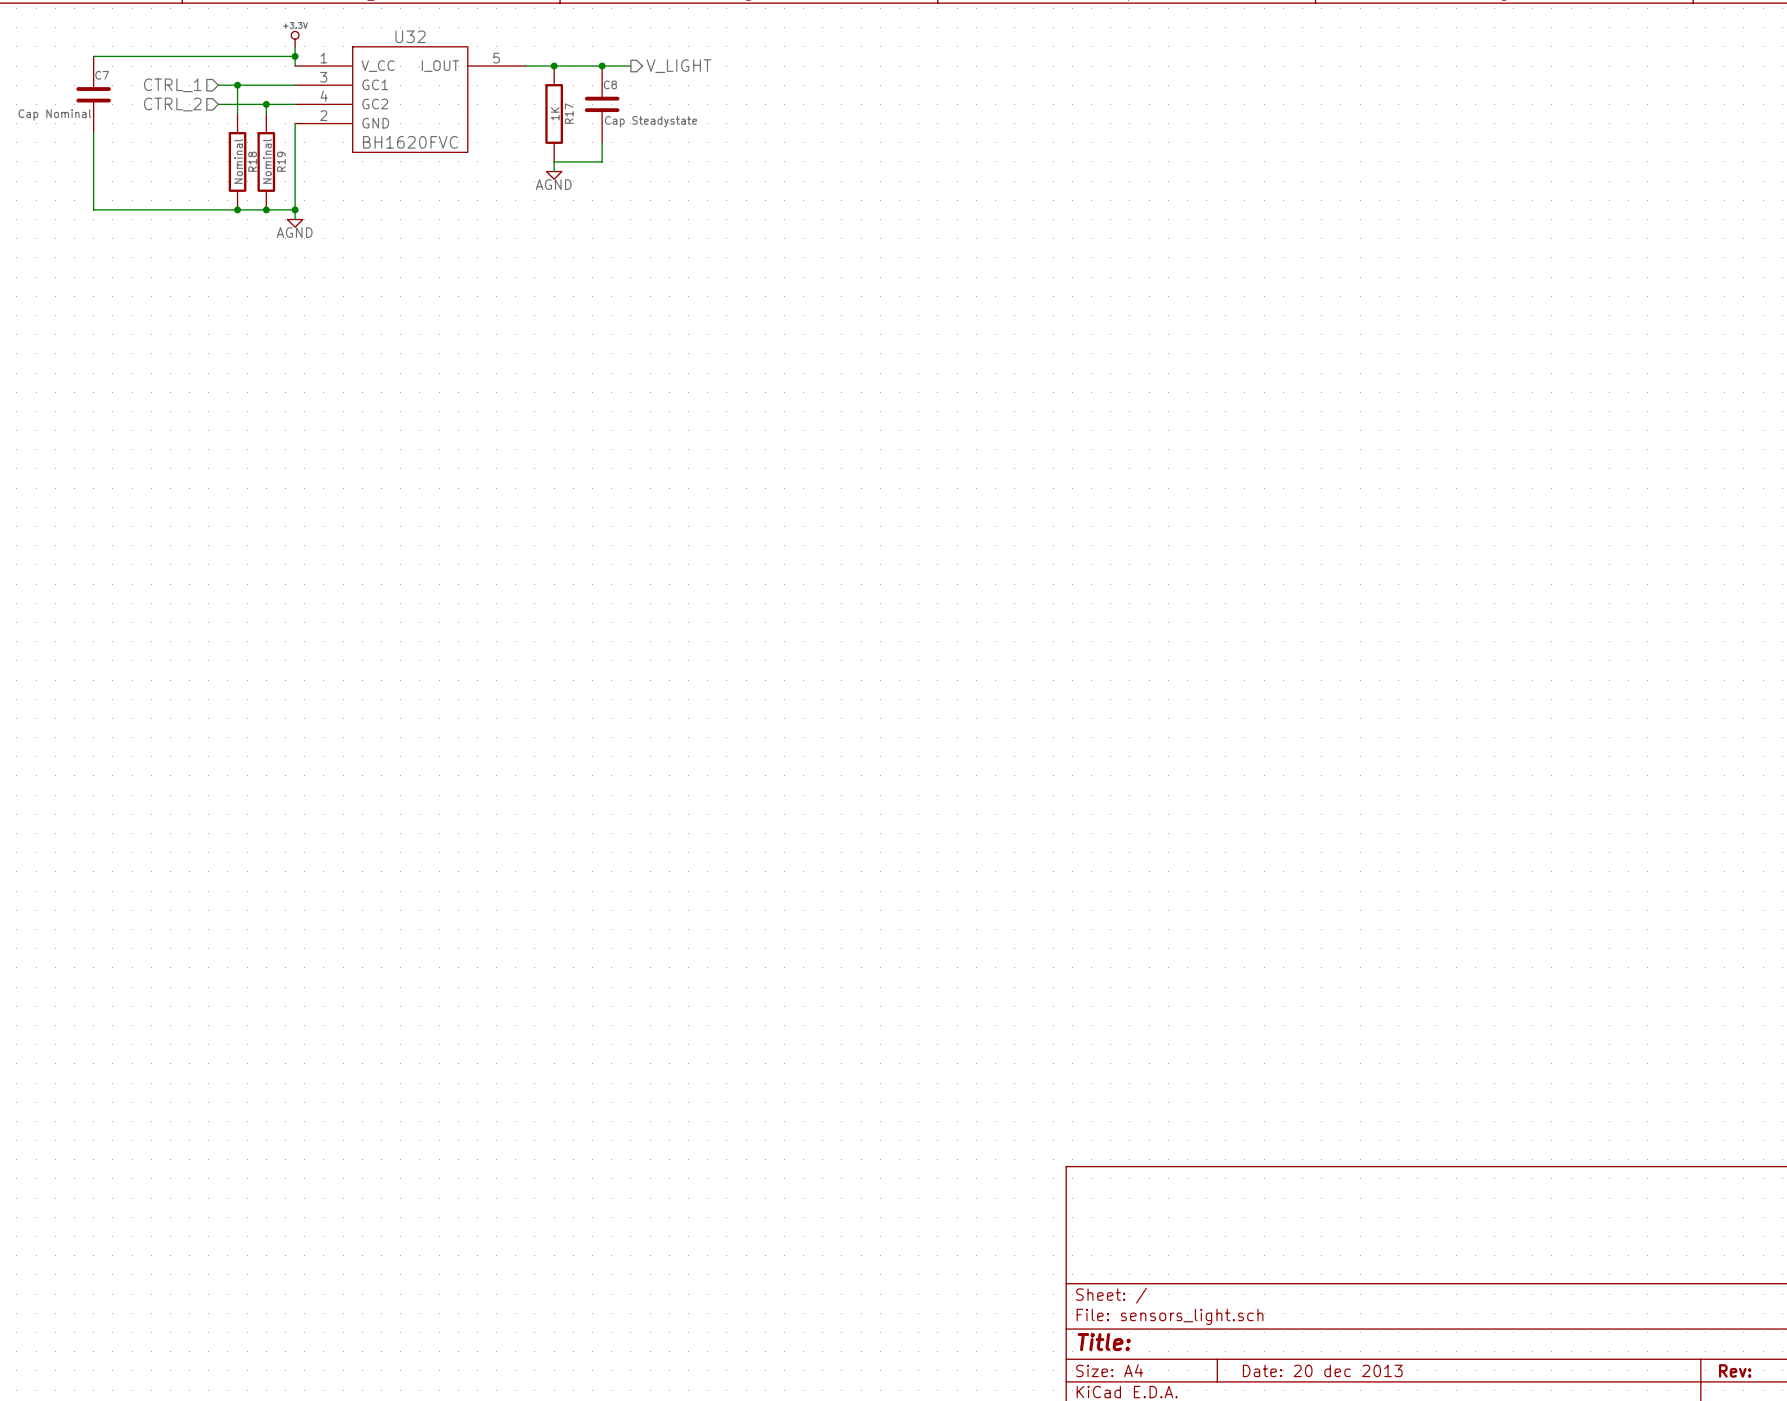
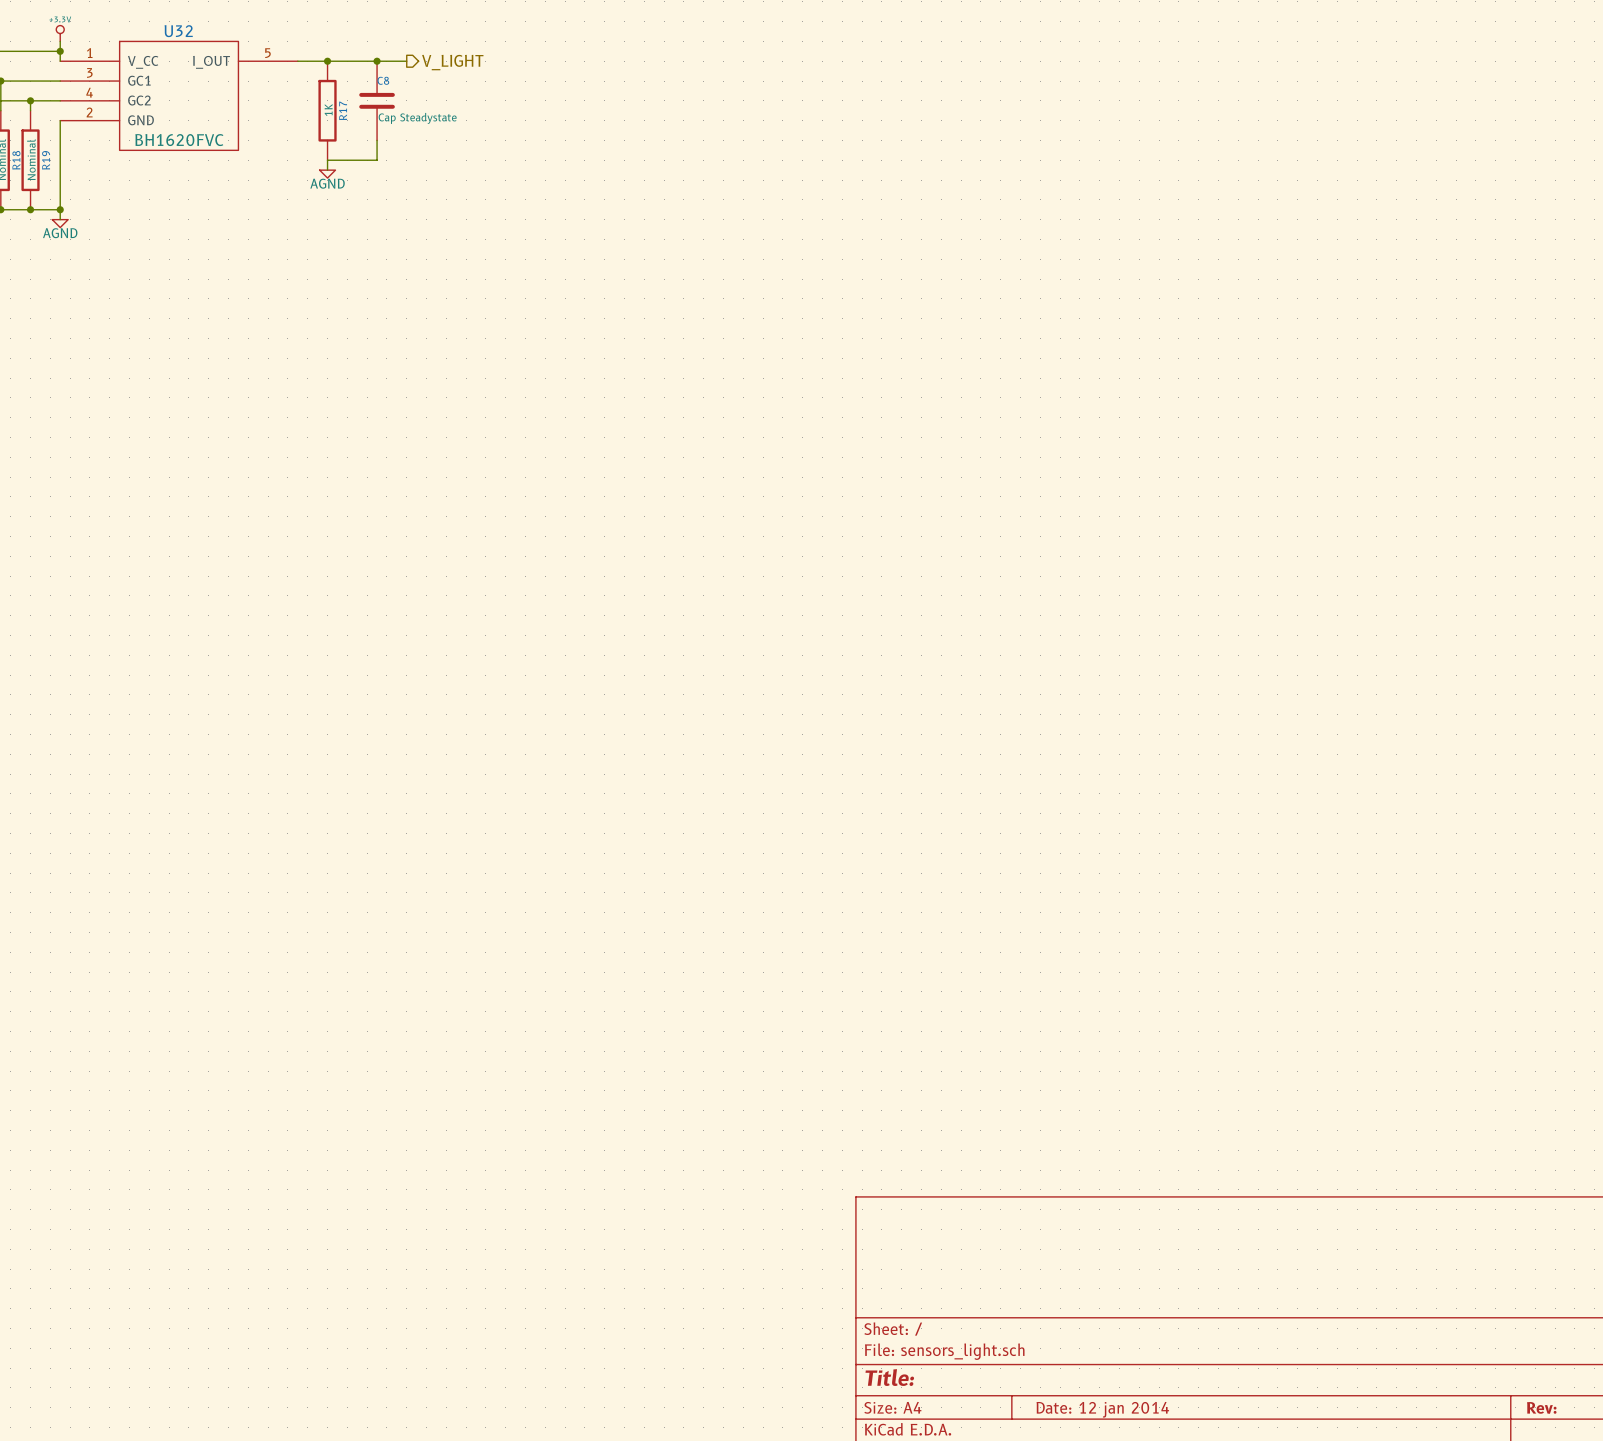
title block: Date: 20 dec 2013 (1322, 1370) -> Date: 12 jan 2014 (1102, 1409)

